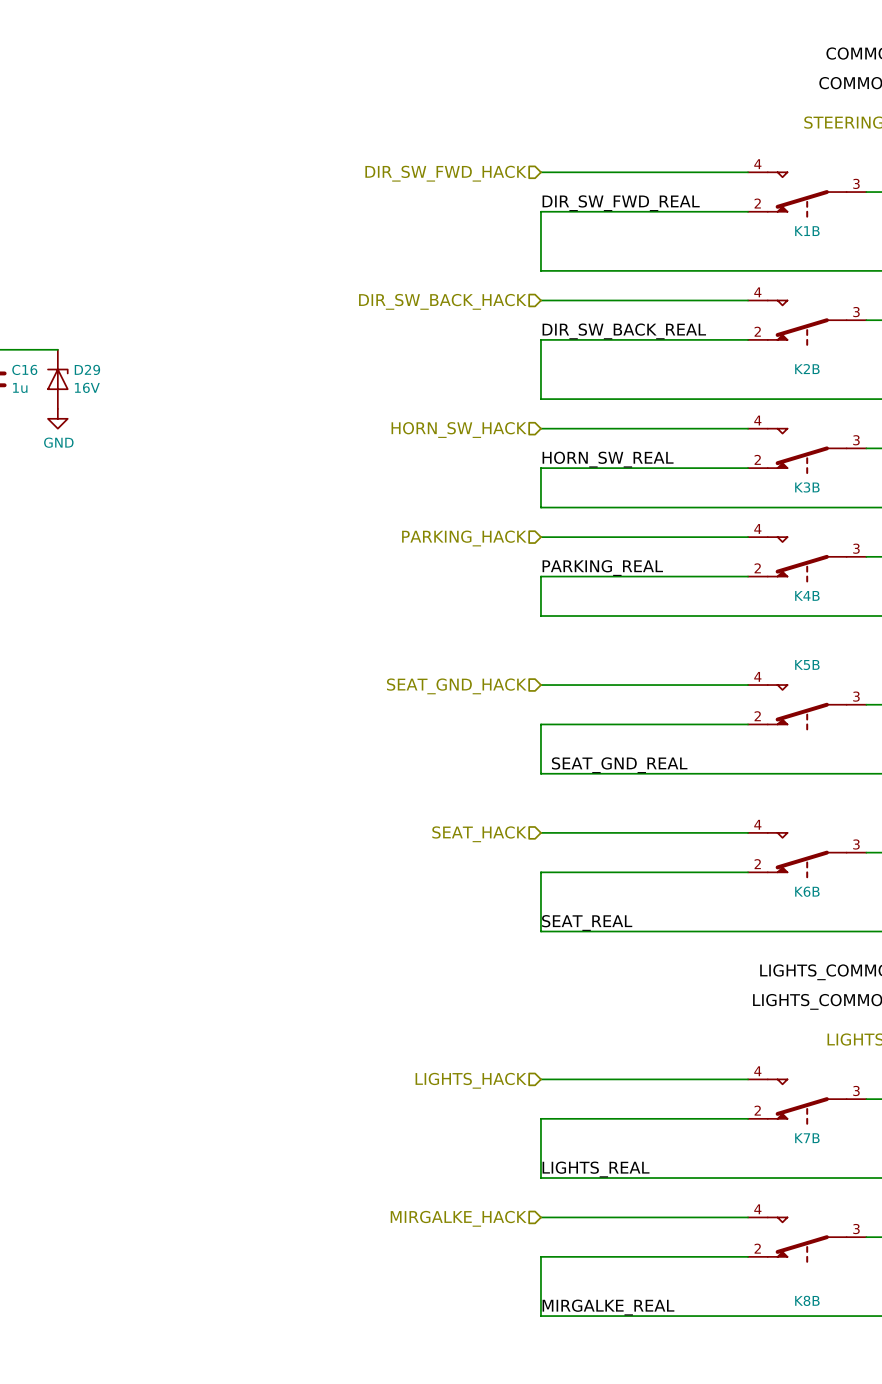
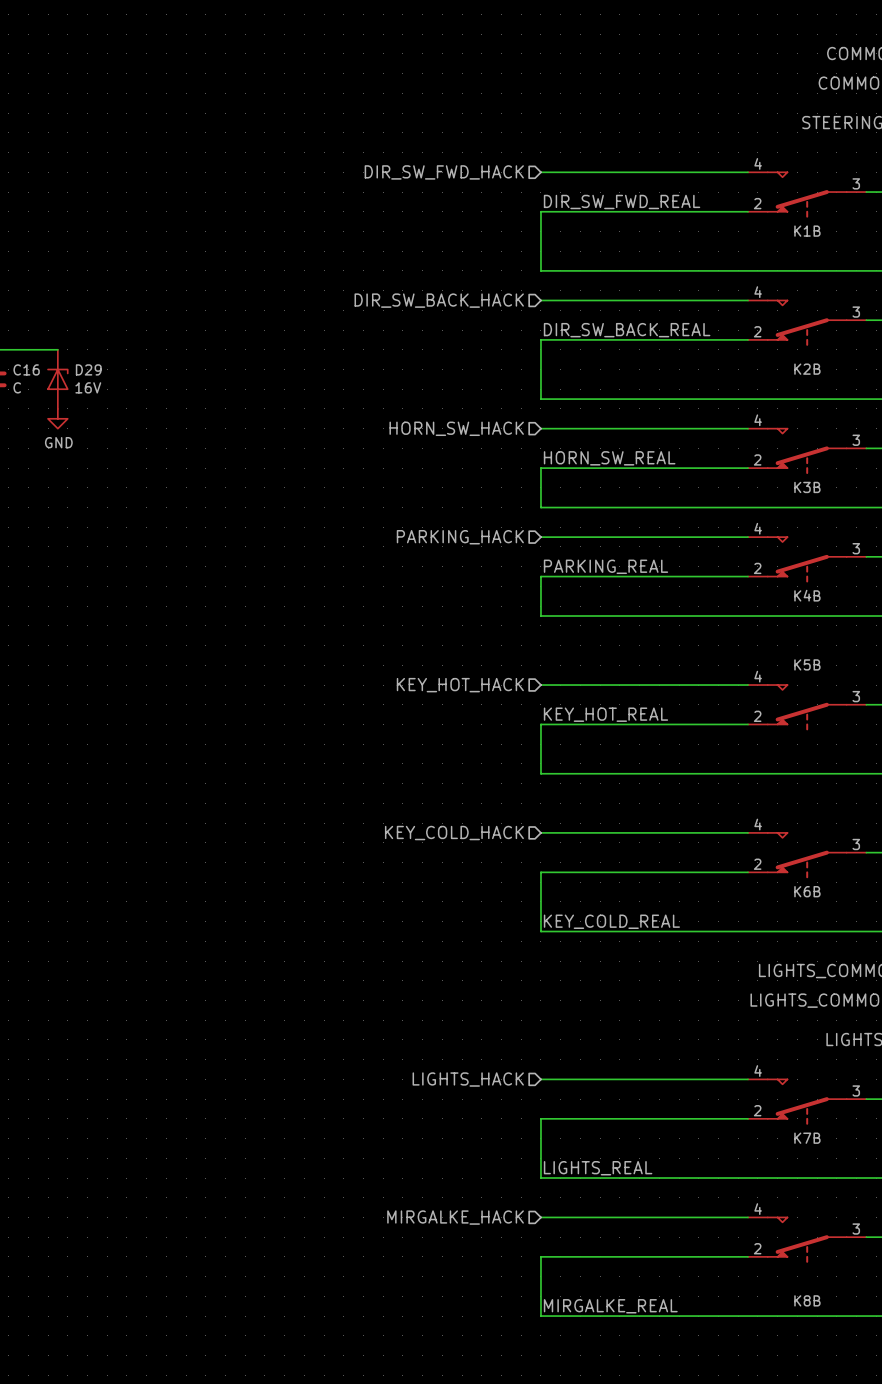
C16 value: 1u (20, 387) -> C (17, 387)
hierarchical label: SEAT_GND_HACK (456, 686) -> KEY_HOT_HACK (460, 685)
label: none -> KEY_HOT_REAL (605, 714)
label: SEAT_GND_REAL (619, 765) -> none
hierarchical label: SEAT_HACK (479, 834) -> KEY_COLD_HACK (454, 833)
label: SEAT_REAL (587, 922) -> KEY_COLD_REAL (611, 921)

